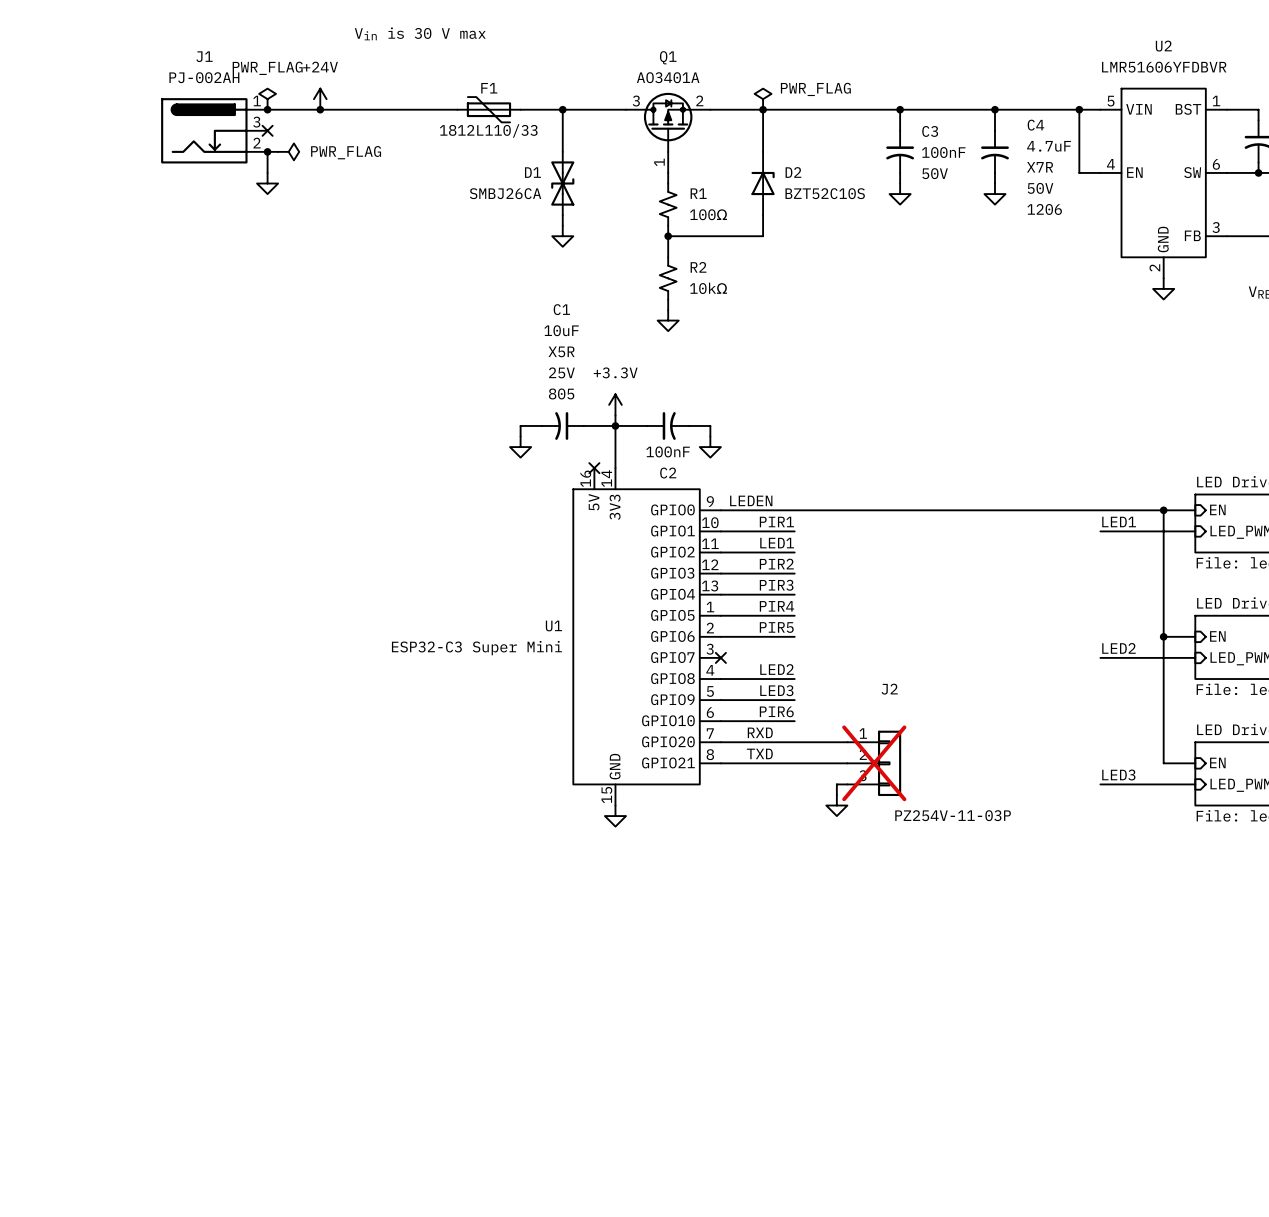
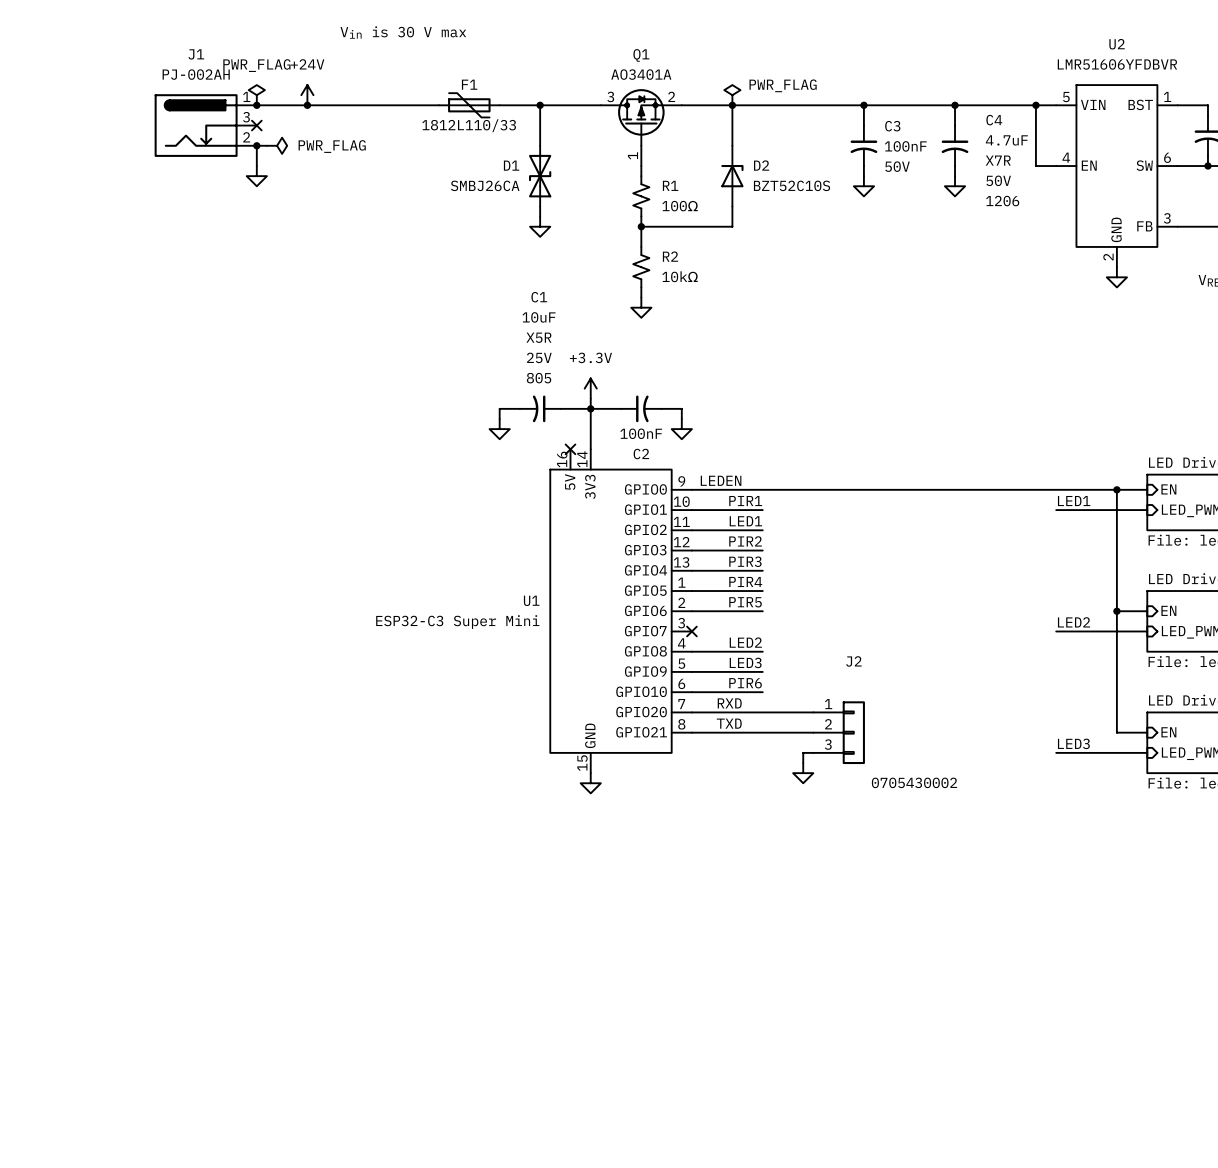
J2 do-not-place cross: (874, 763) -> none
J2 value: PZ254V-11-03P (953, 815) -> 0705430002 (914, 782)

